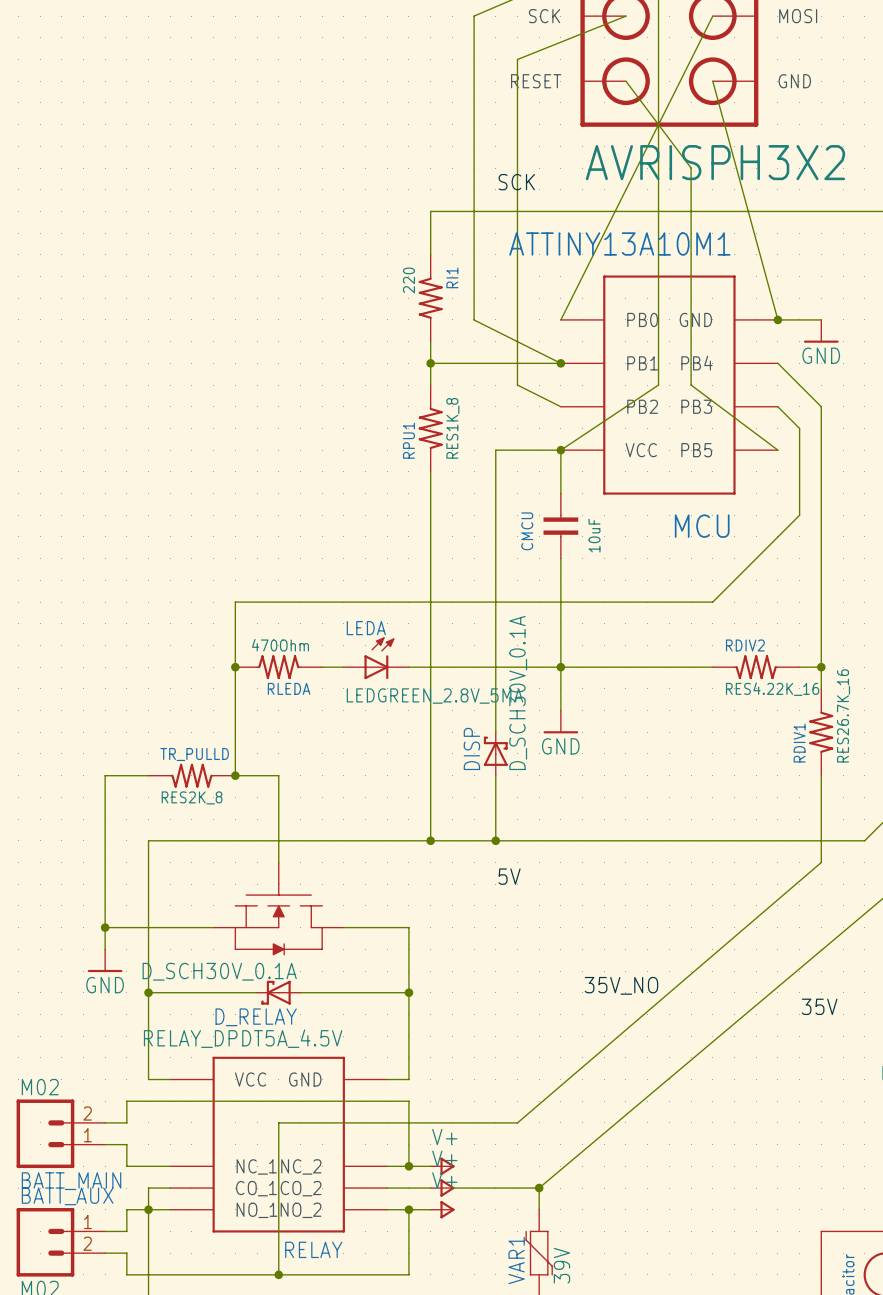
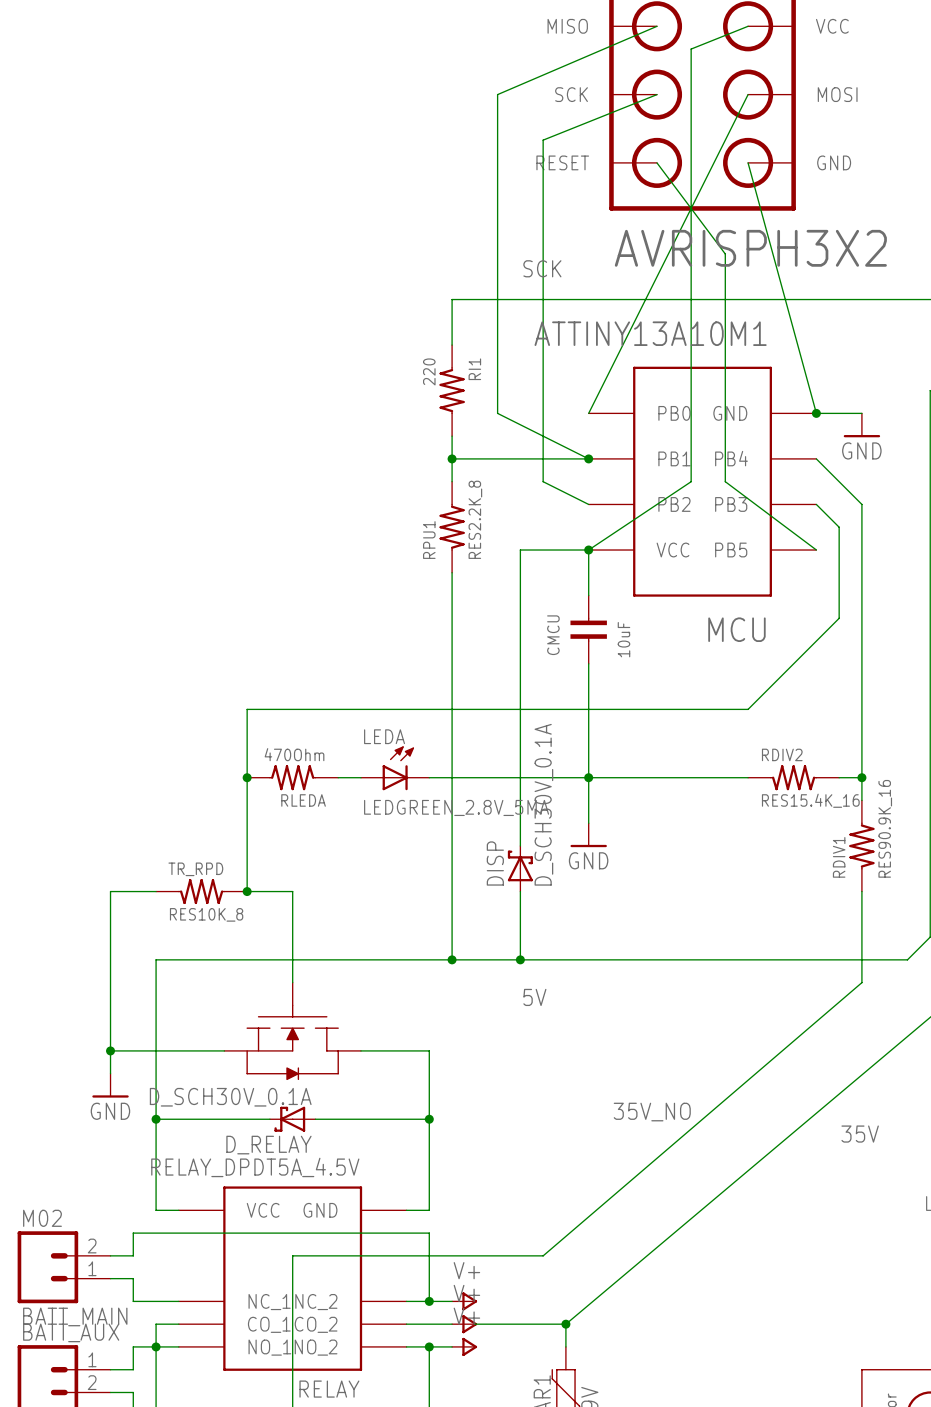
RPU1 value: RES1K_8 (452, 428) -> RES2.2K_8 (475, 519)
RDIV2 value: RES4.22K_16 (772, 689) -> RES15.4K_16 (810, 800)
RDIV1 value: RES26.7K_16 (843, 715) -> RES90.9K_16 (885, 828)
TR_PULLD name: TR_PULLD (194, 754) -> TR_RPD (195, 869)
TR_PULLD value: RES2K_8 (192, 797) -> RES10K_8 (206, 914)

